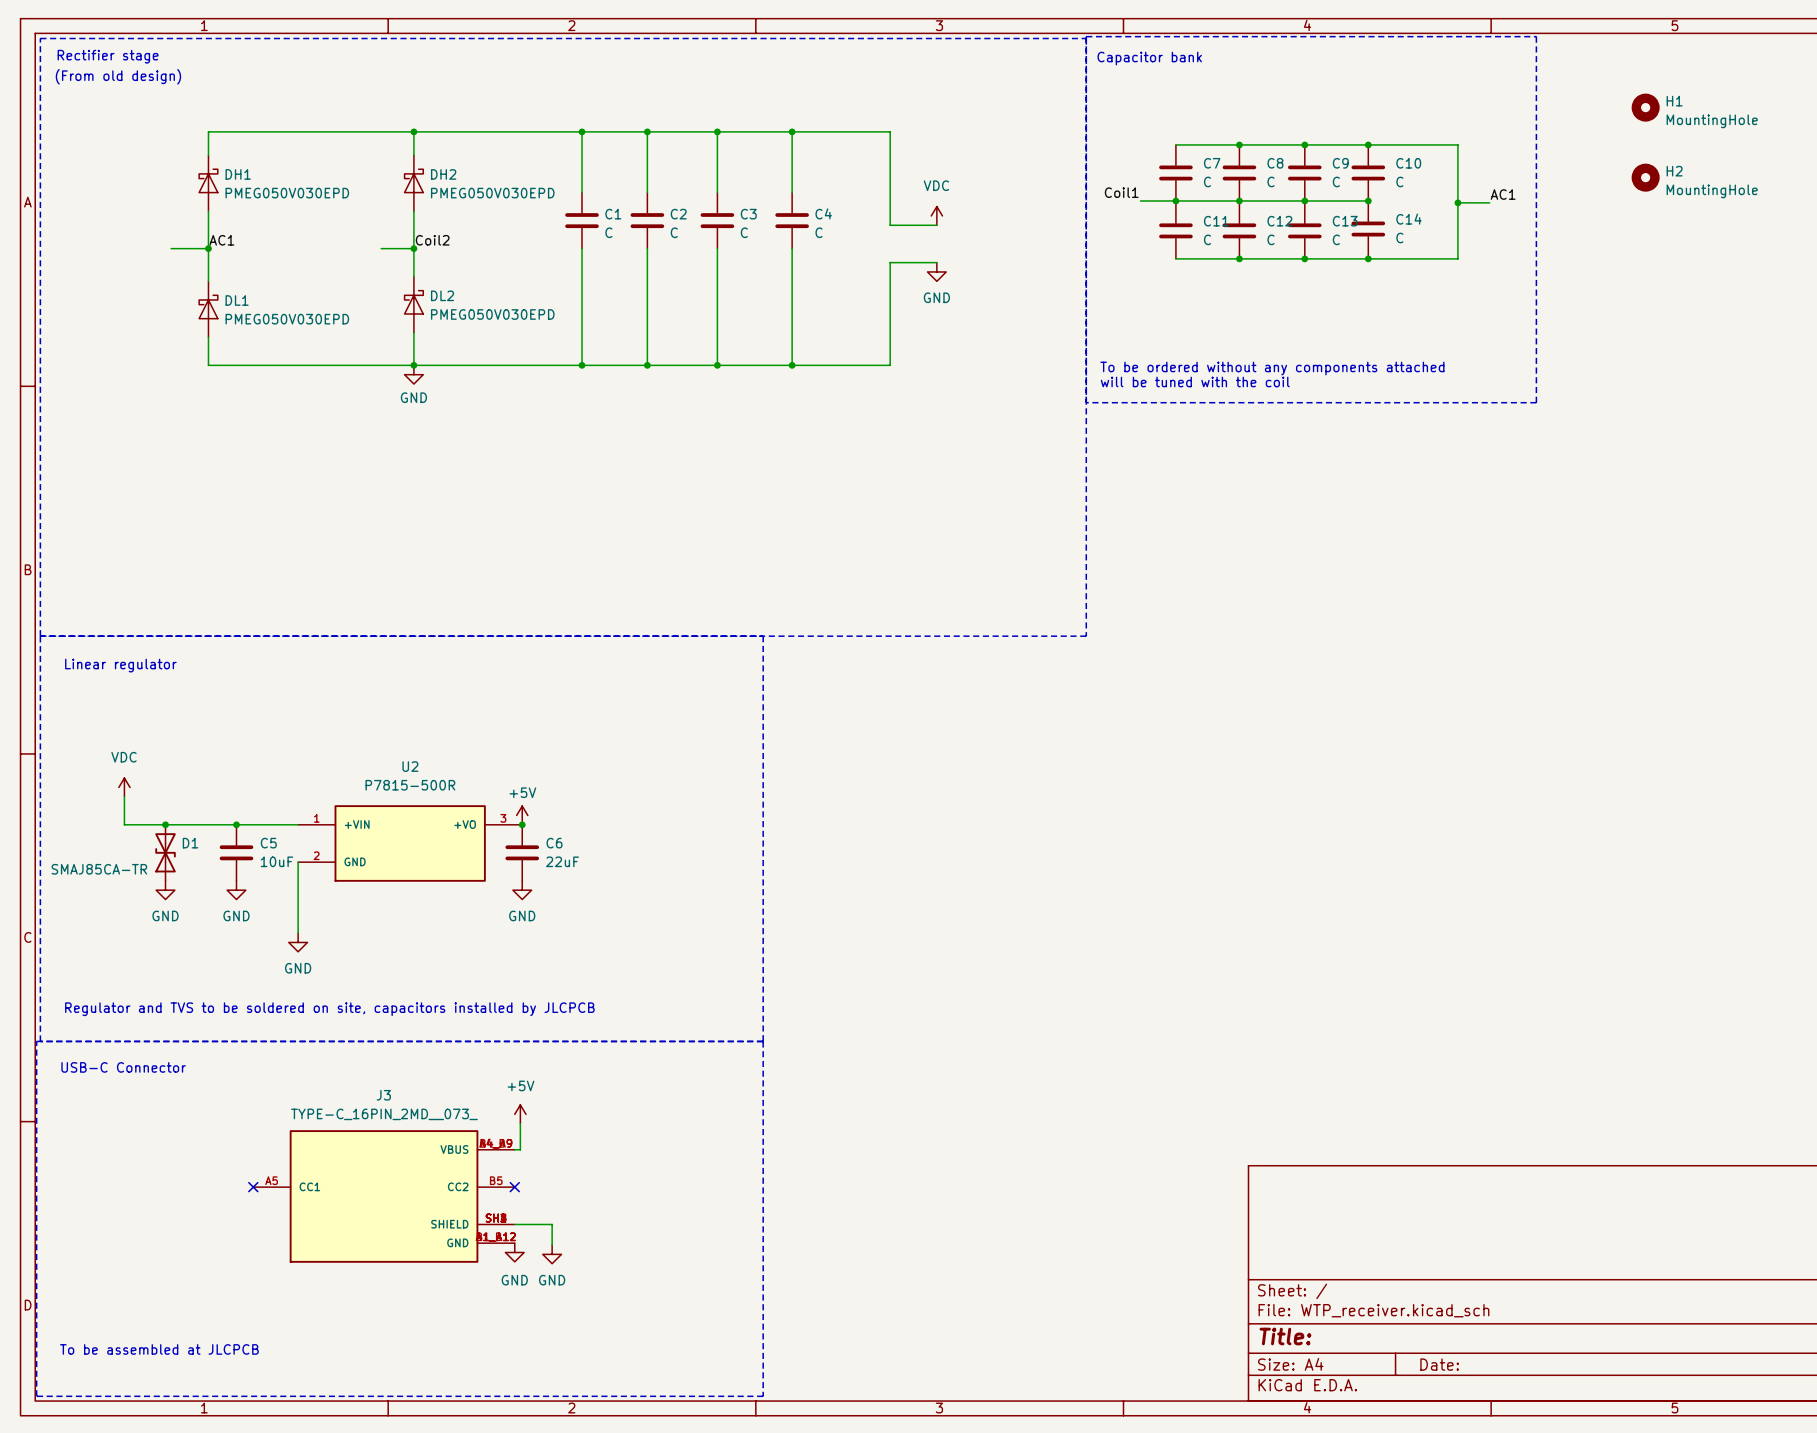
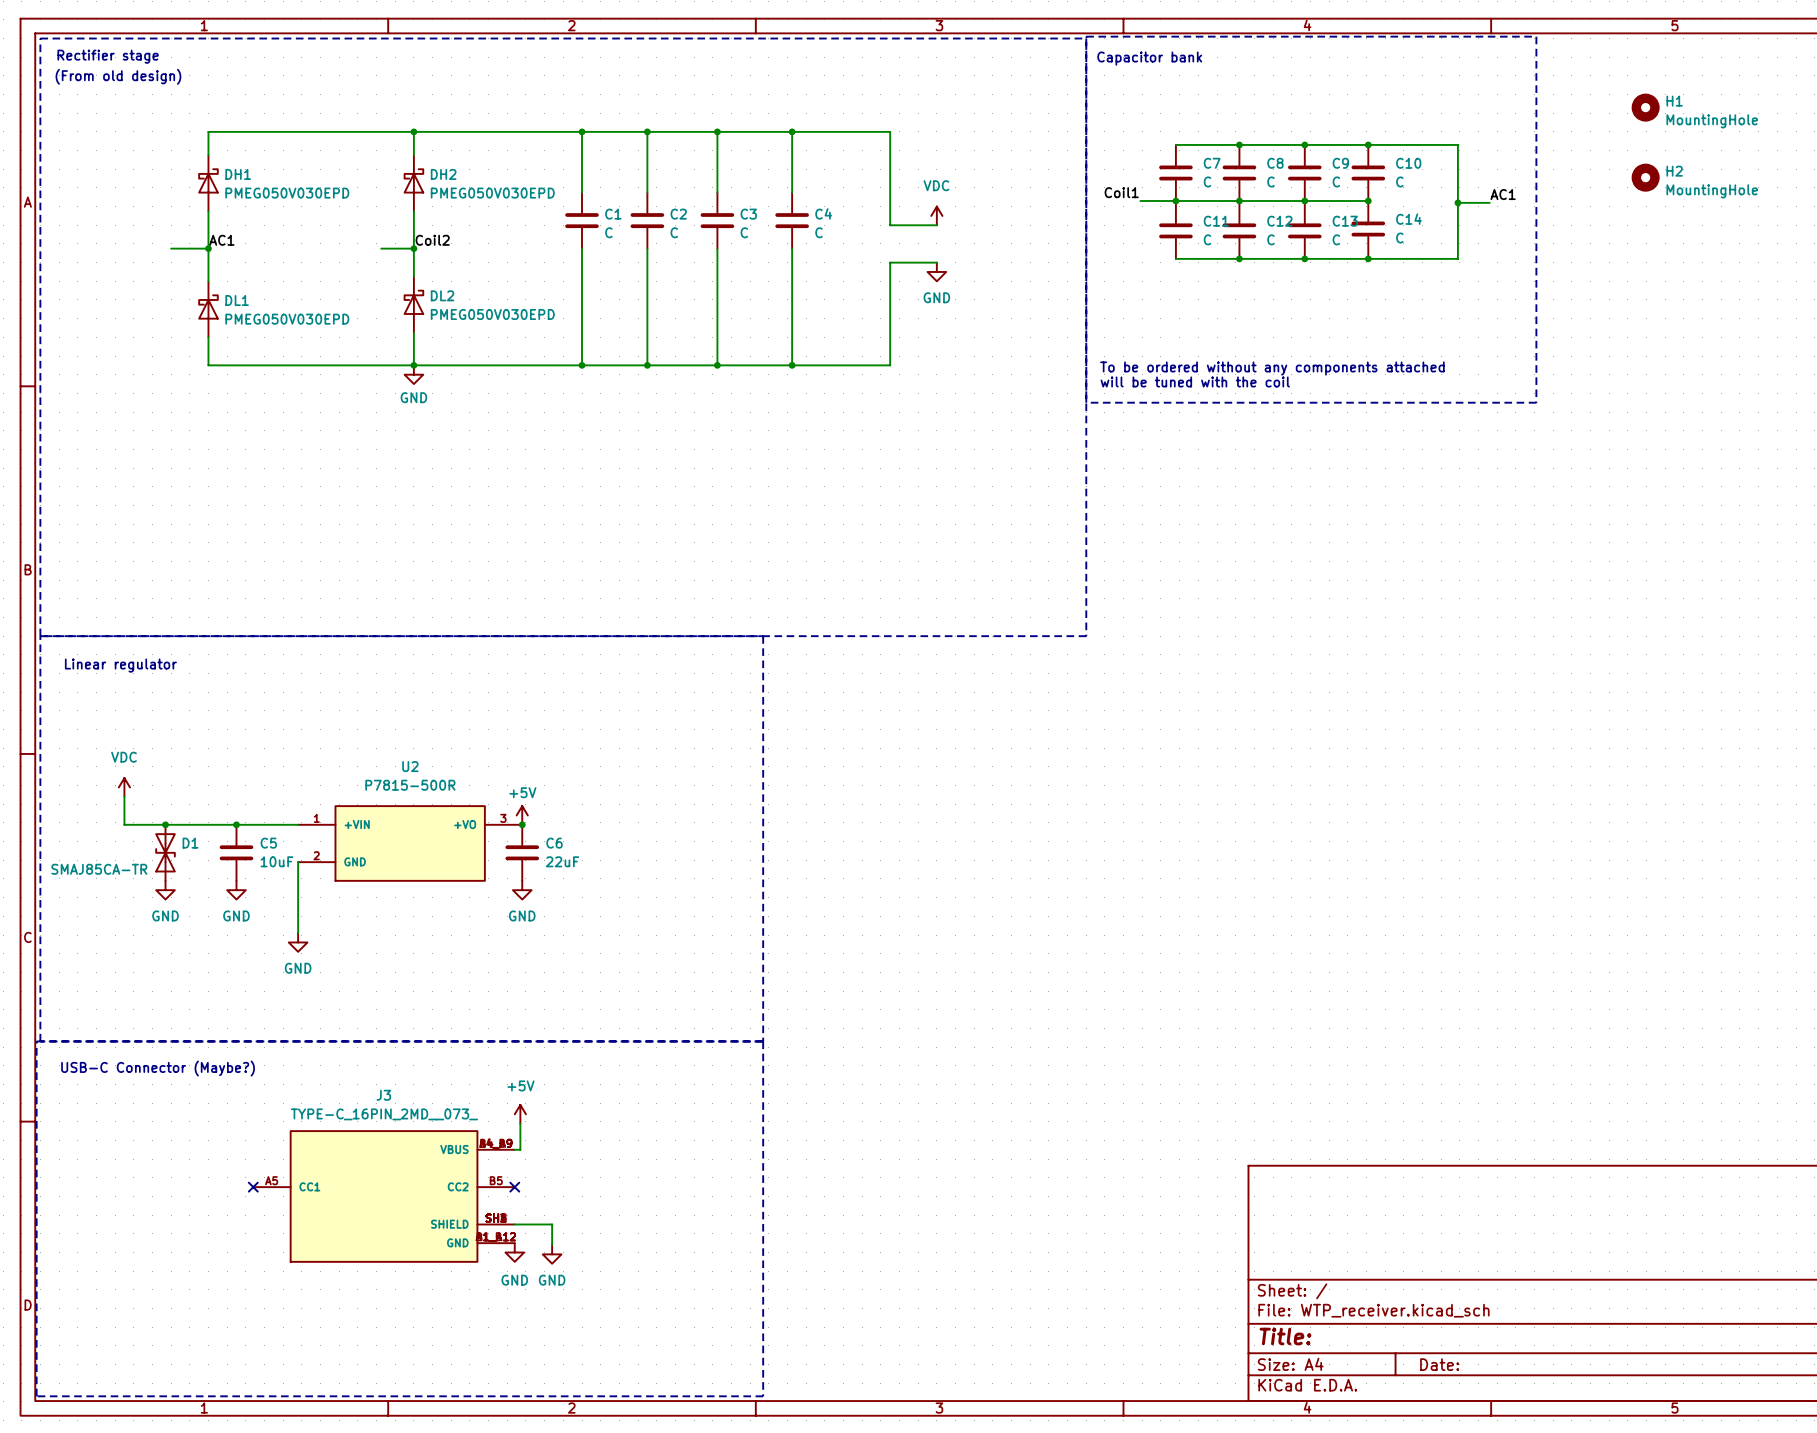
text: Regulator and TVS to be soldered on site, capacitors installed by JLCPCB (329, 1009) -> none
text: USB-C Connector (123, 1067) -> USB-C Connector (Maybe?) (158, 1068)
text: To be assembled at JLCPCB (159, 1349) -> none

